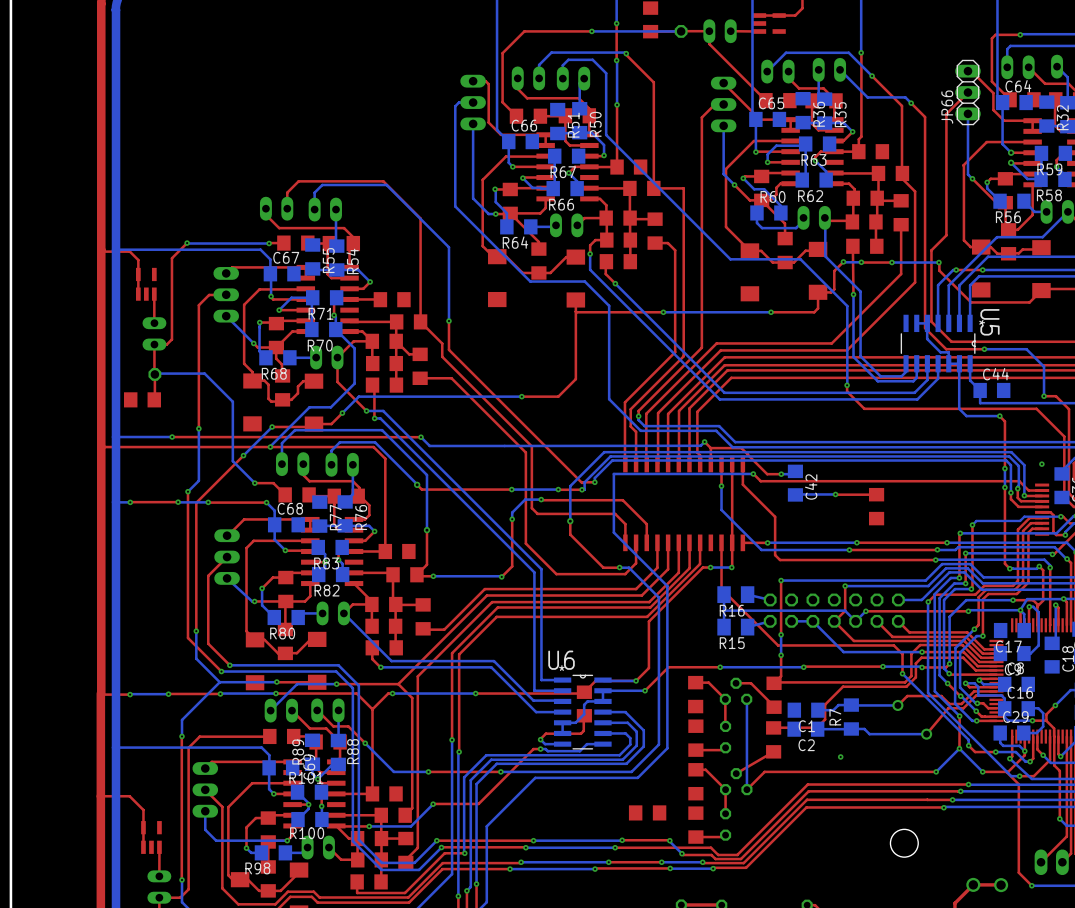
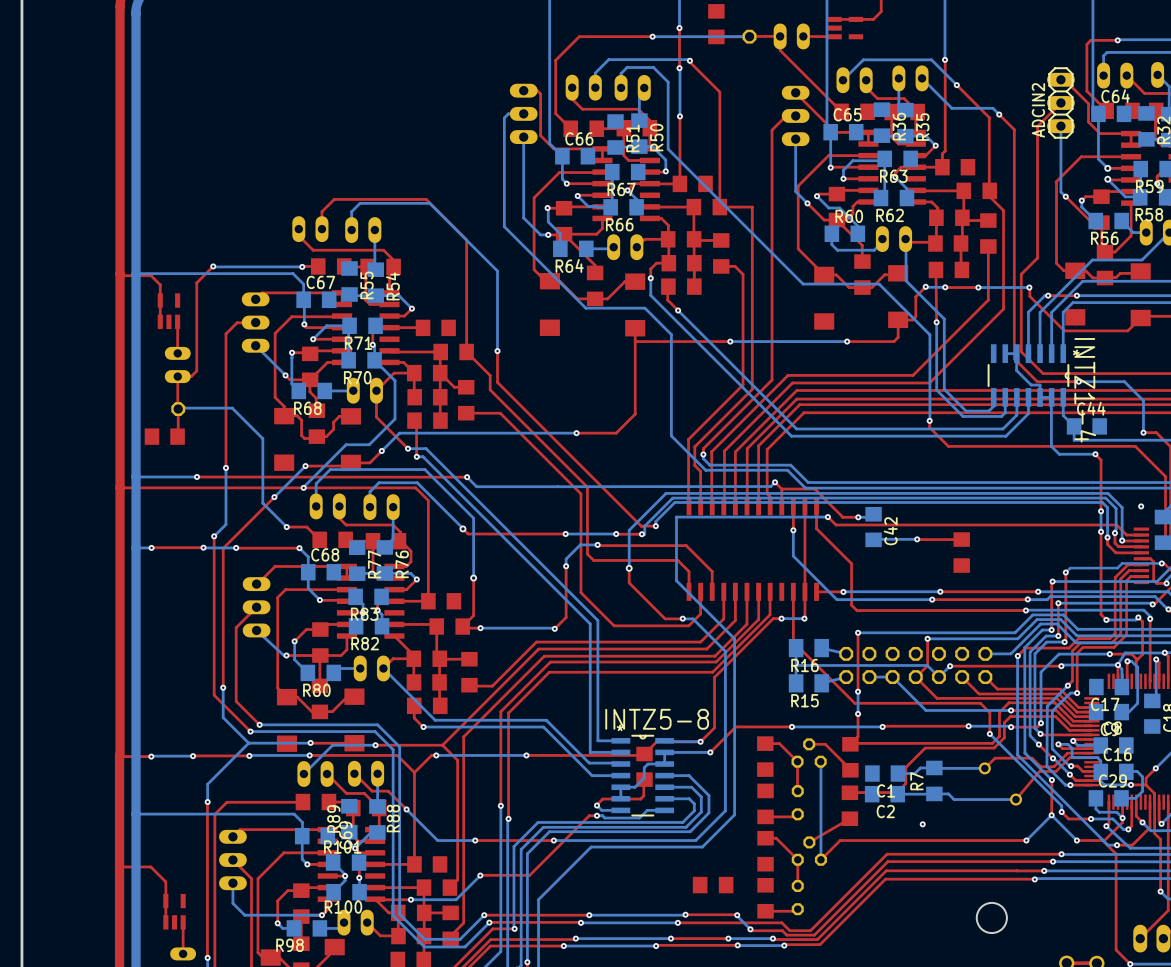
JP66 name: JP66 (947, 107) -> ADCIN2 (1038, 110)
U5 name: U5 (989, 322) -> INTZ1-4 (1085, 390)
U6 name: U6 (561, 660) -> INTZ5-8 (657, 719)

